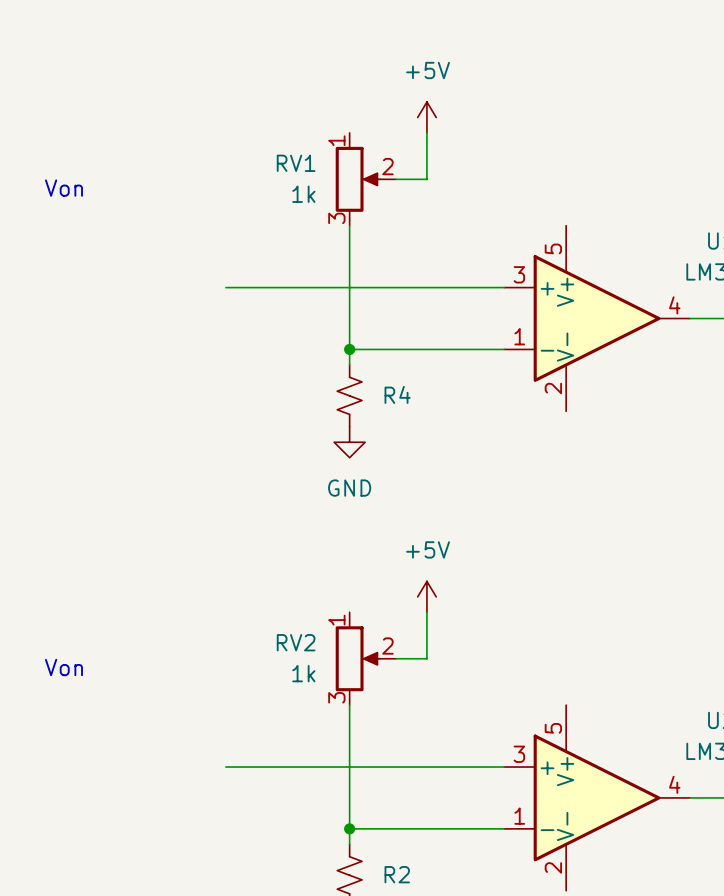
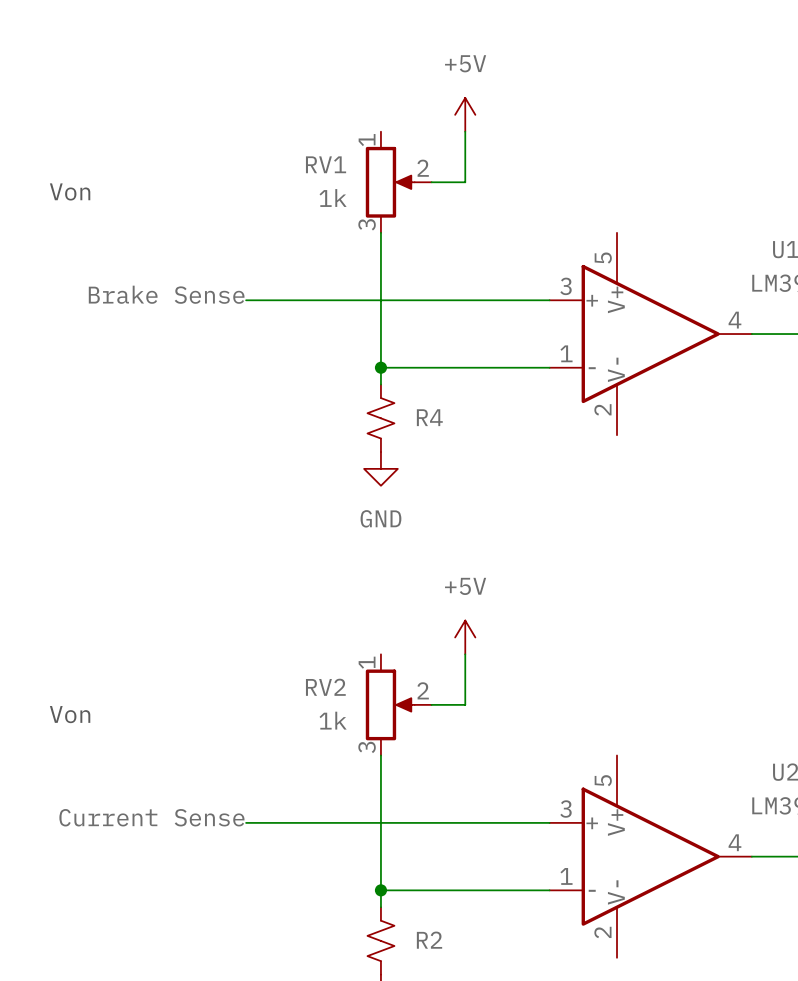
label: none -> Brake Sense (166, 294)
label: none -> Current Sense (151, 817)

